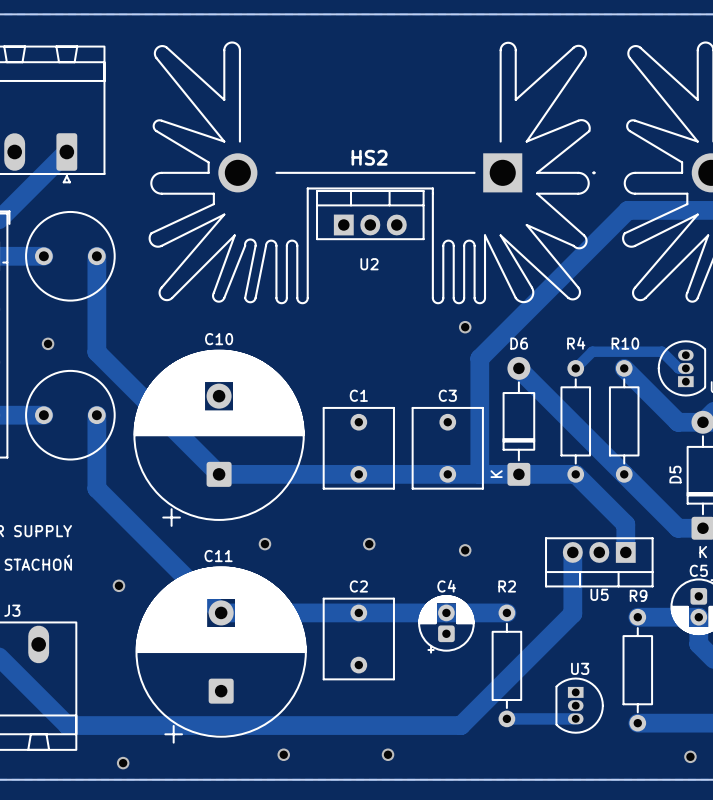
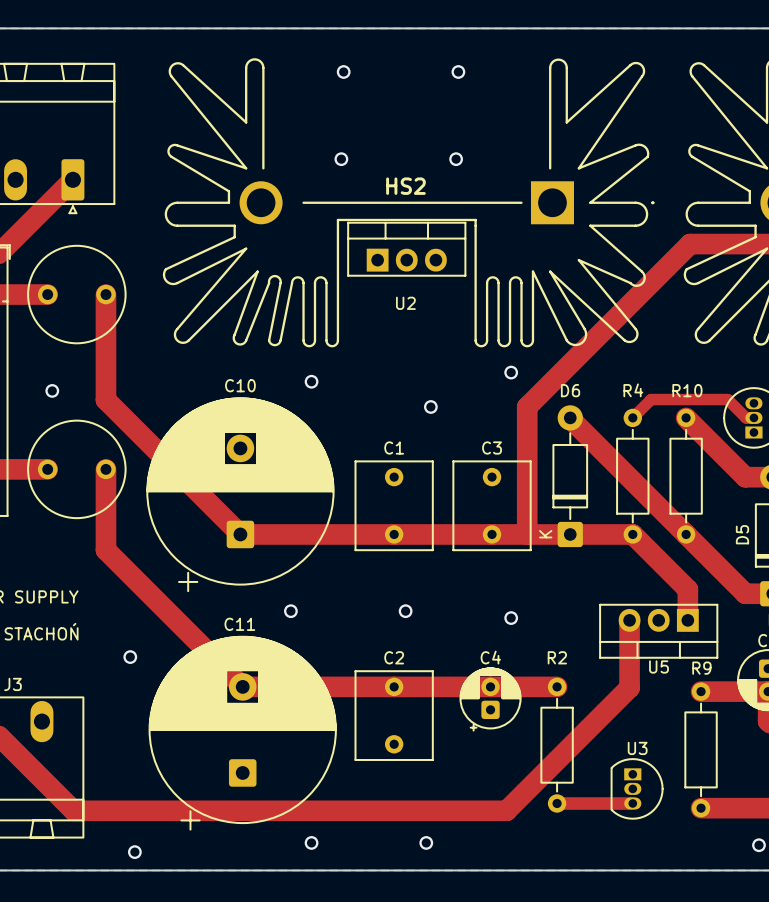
via: none -> (343, 71)
via: none -> (458, 71)
via: none -> (341, 159)
via: none -> (456, 159)
via: none -> (311, 381)
via: none -> (430, 406)

